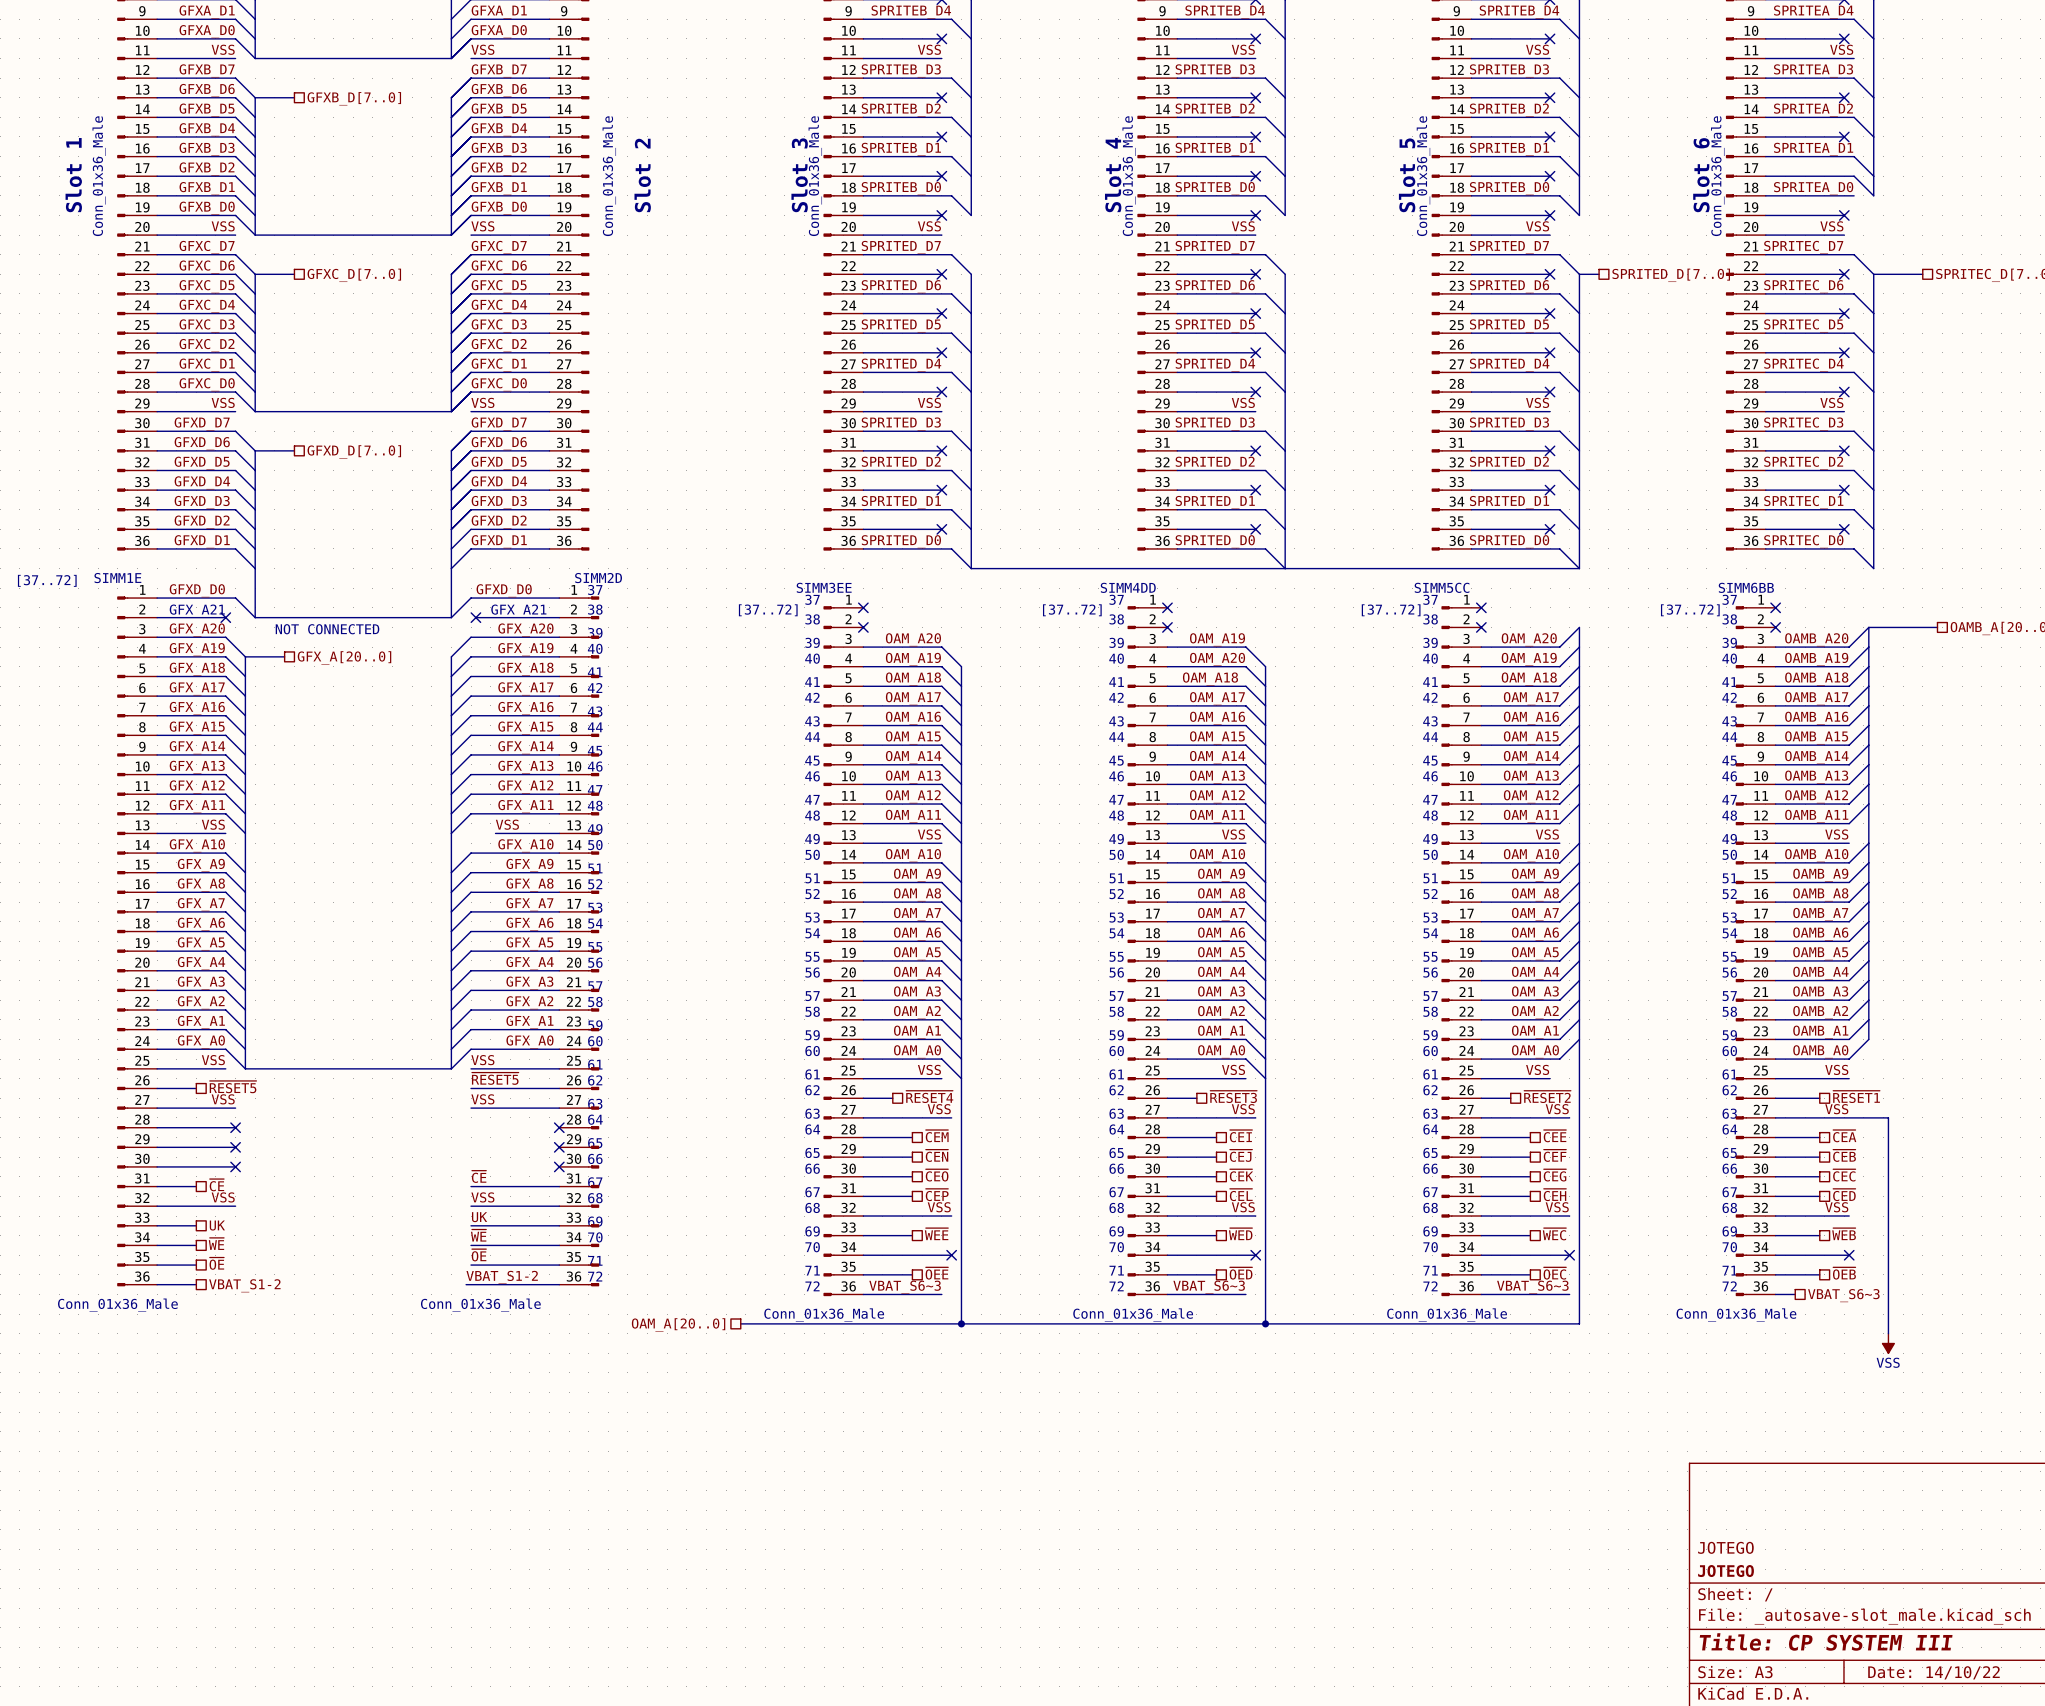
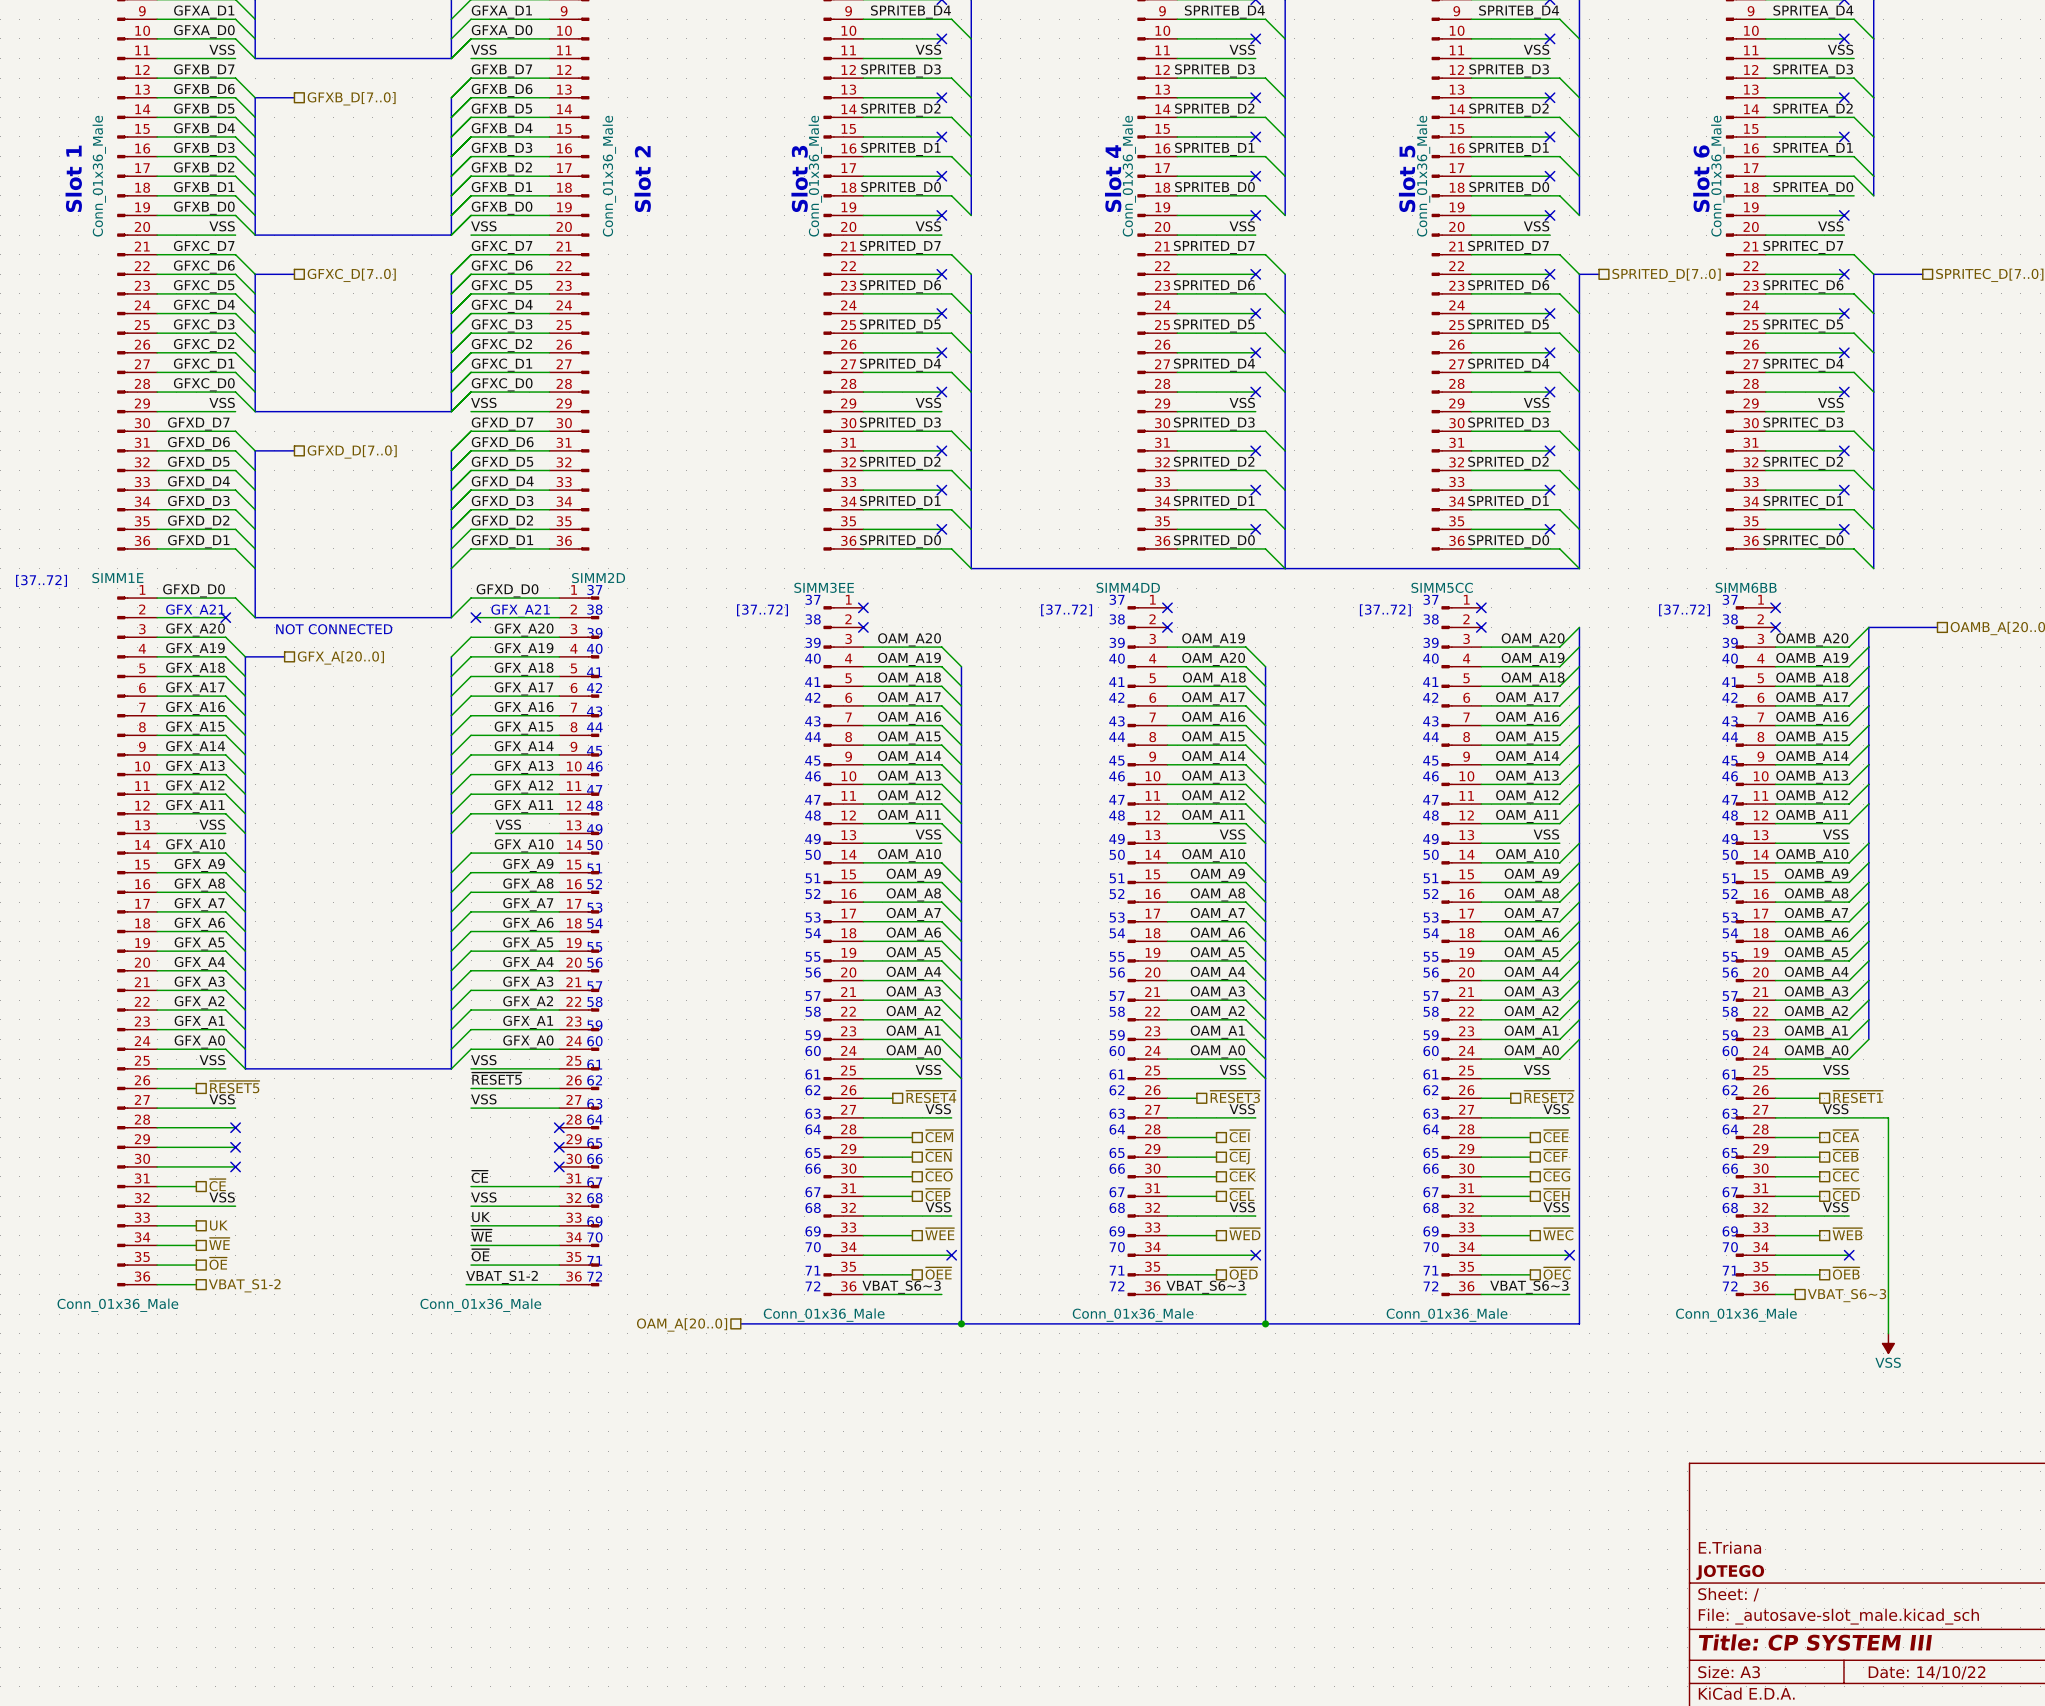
title block: JOTEGO (1725, 1547) -> E.Triana (1729, 1547)

